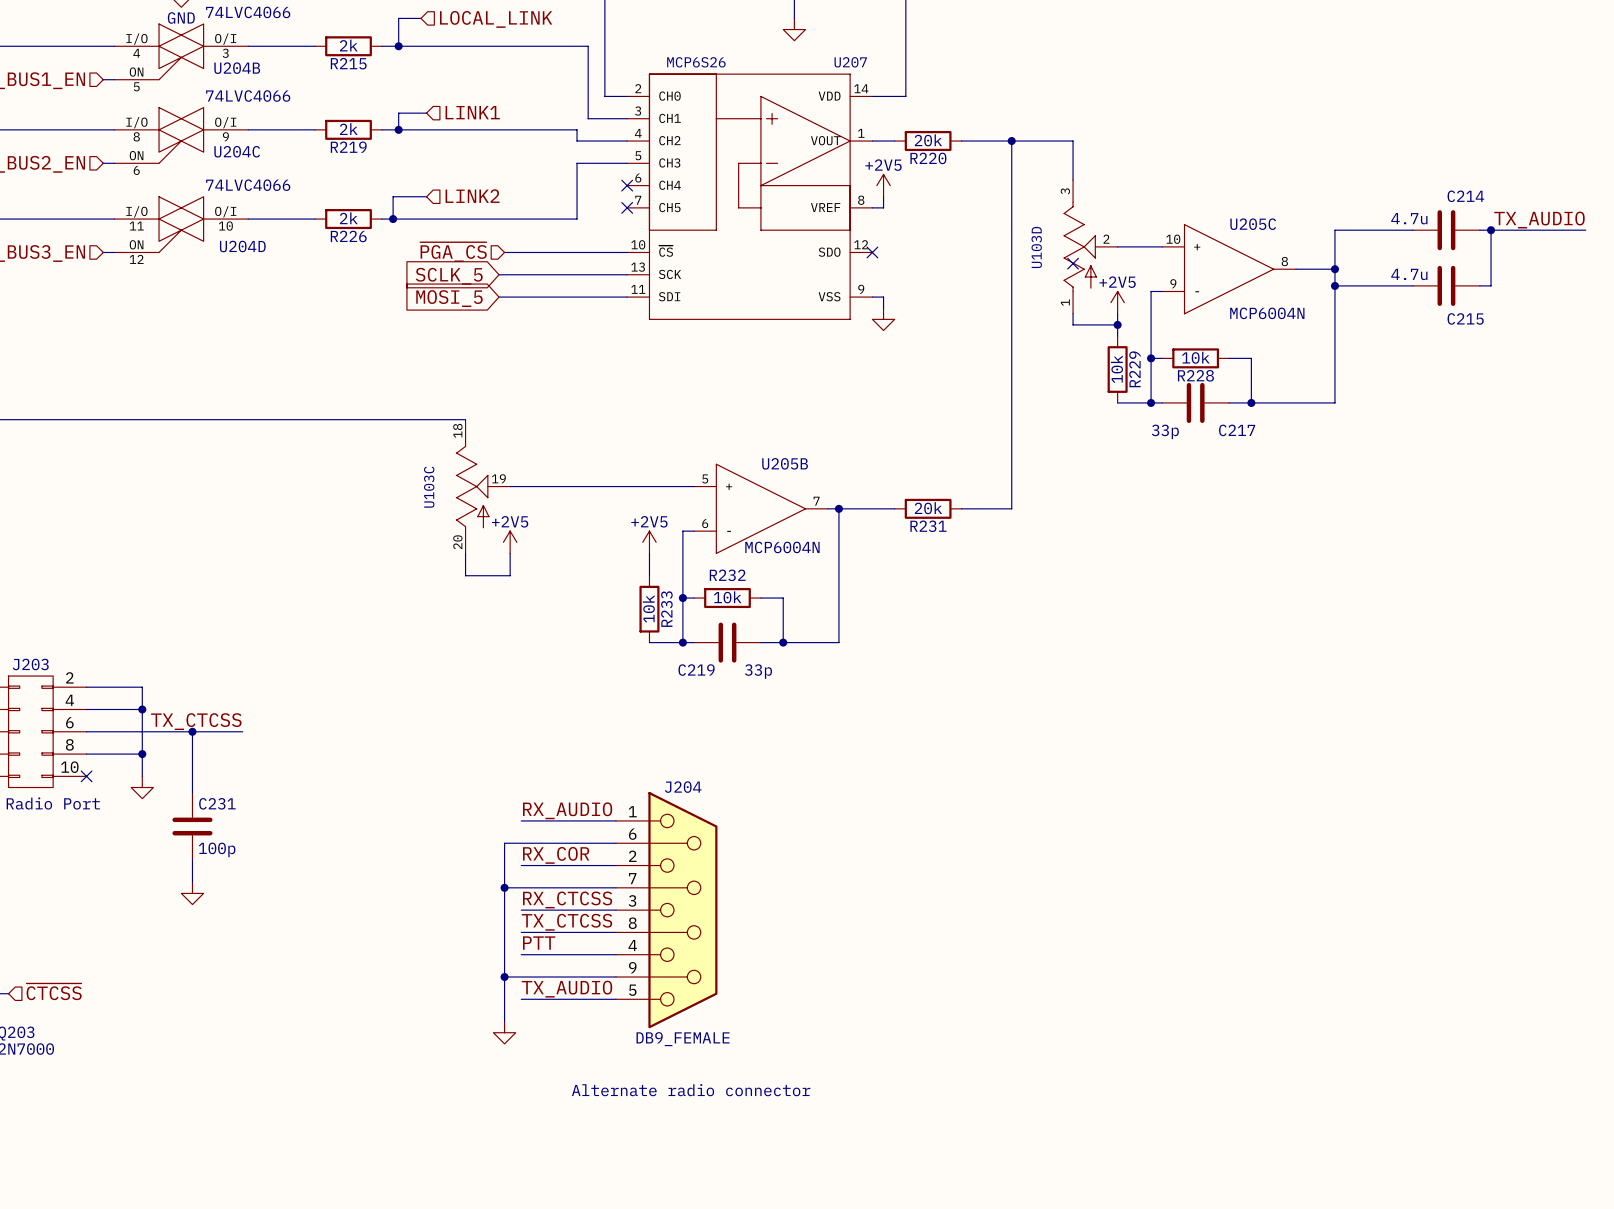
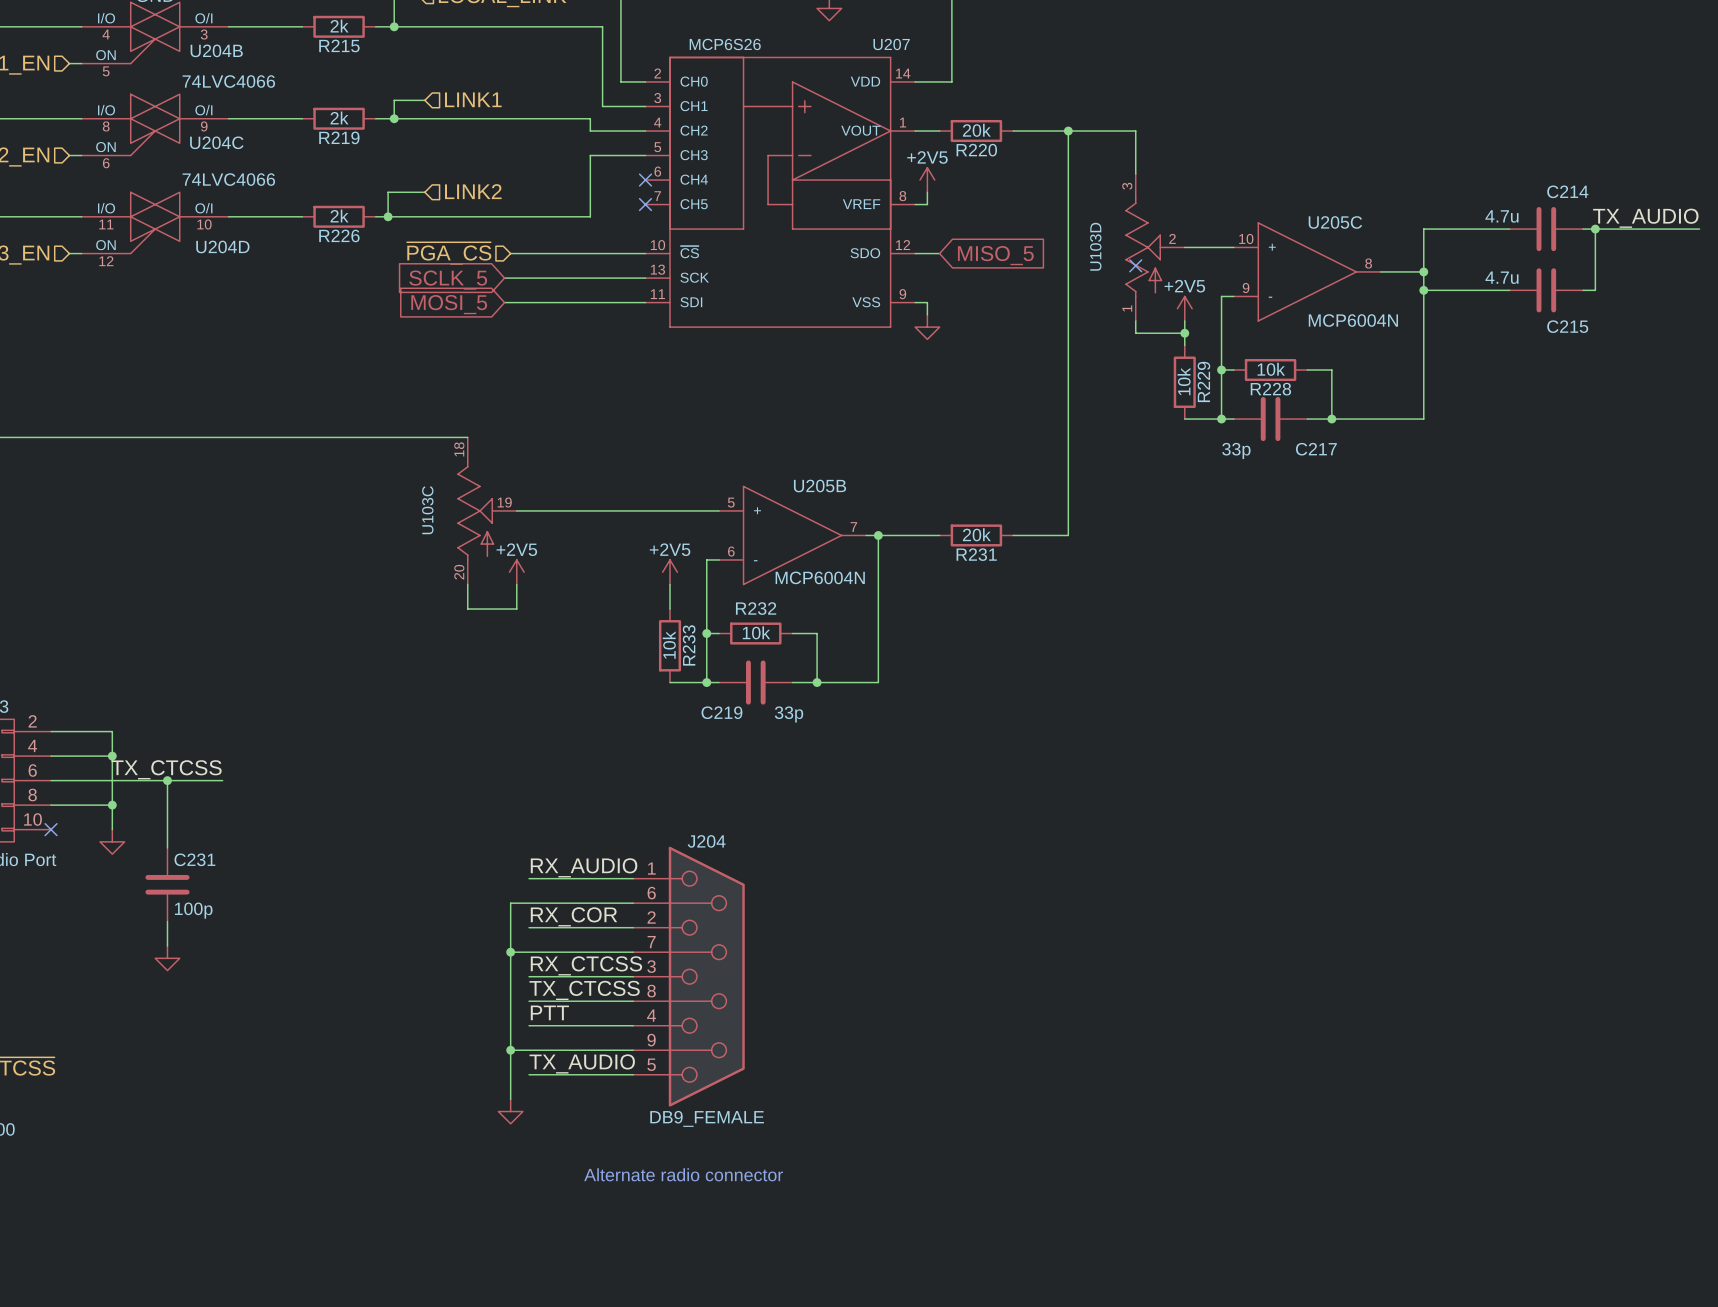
wire: none -> (915, 253) (939, 253)
no-connect mark: (872, 252) -> none
global label: none -> MISO_5 (995, 255)

